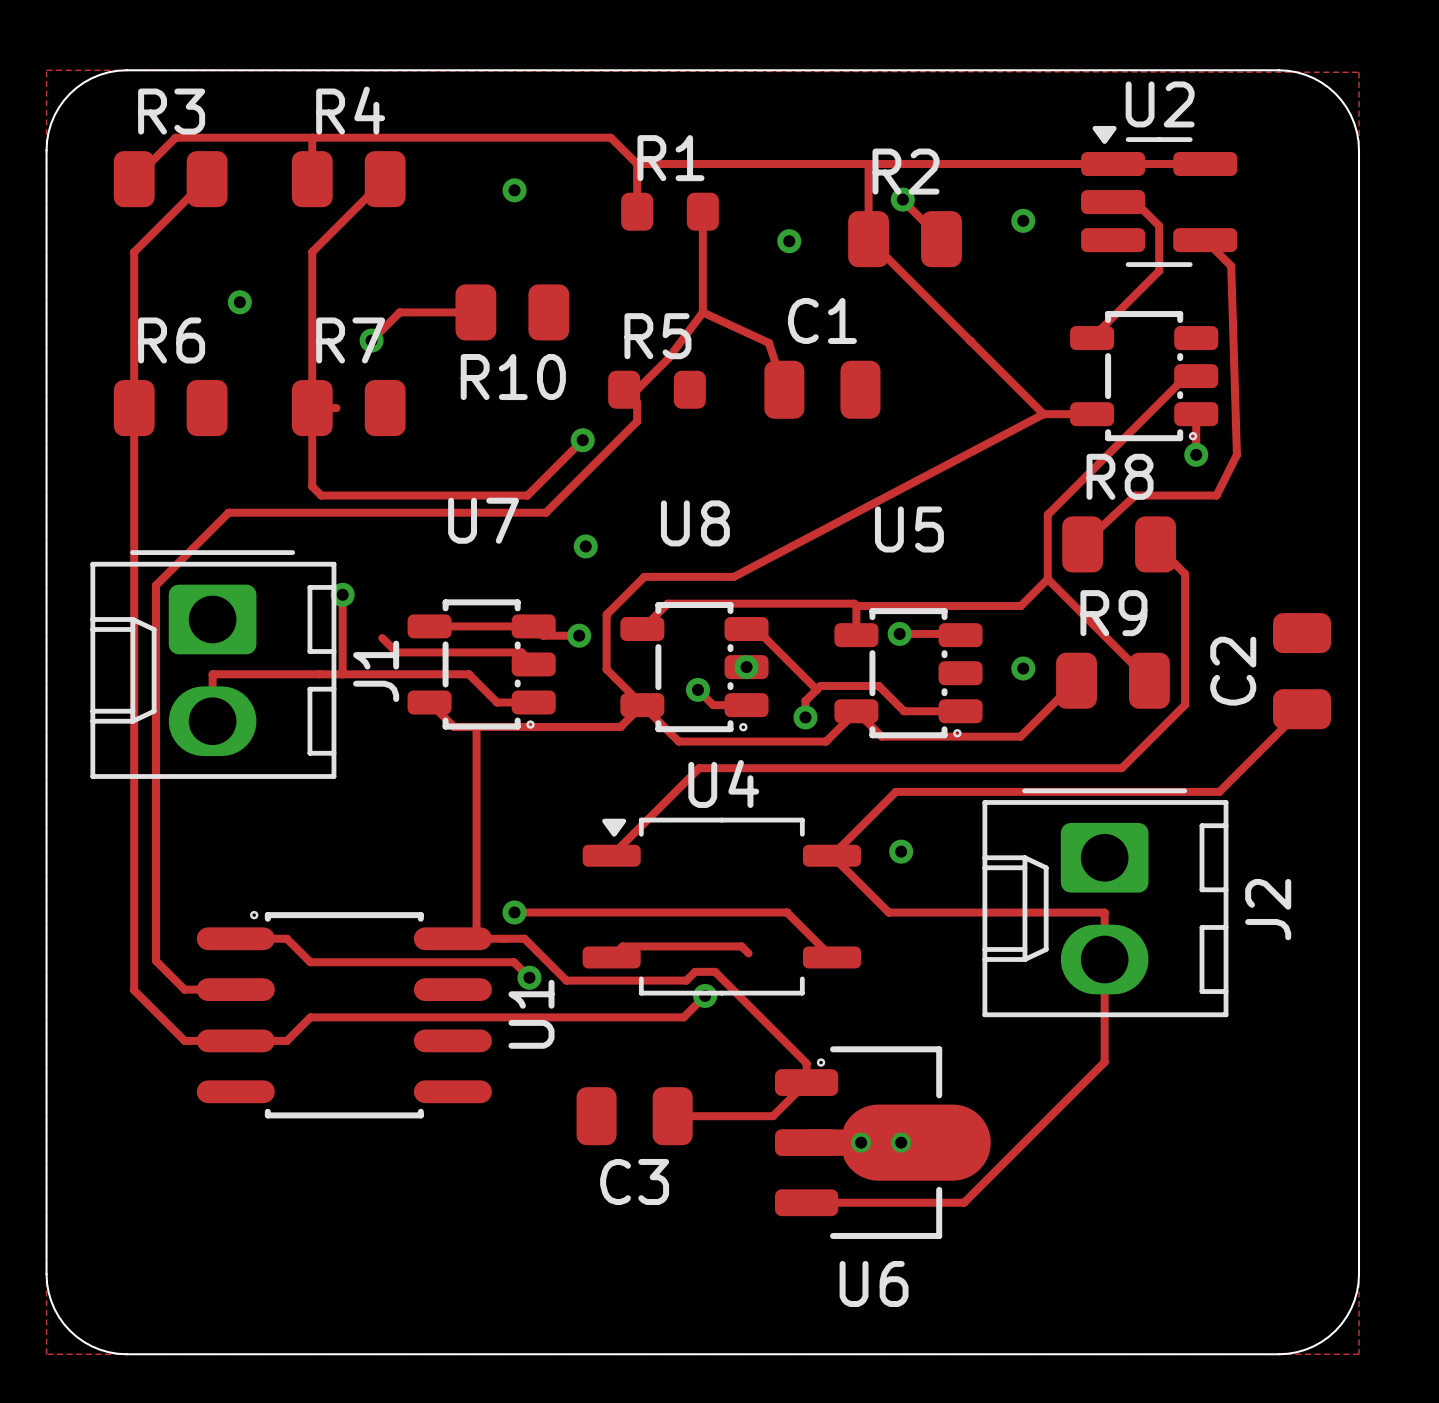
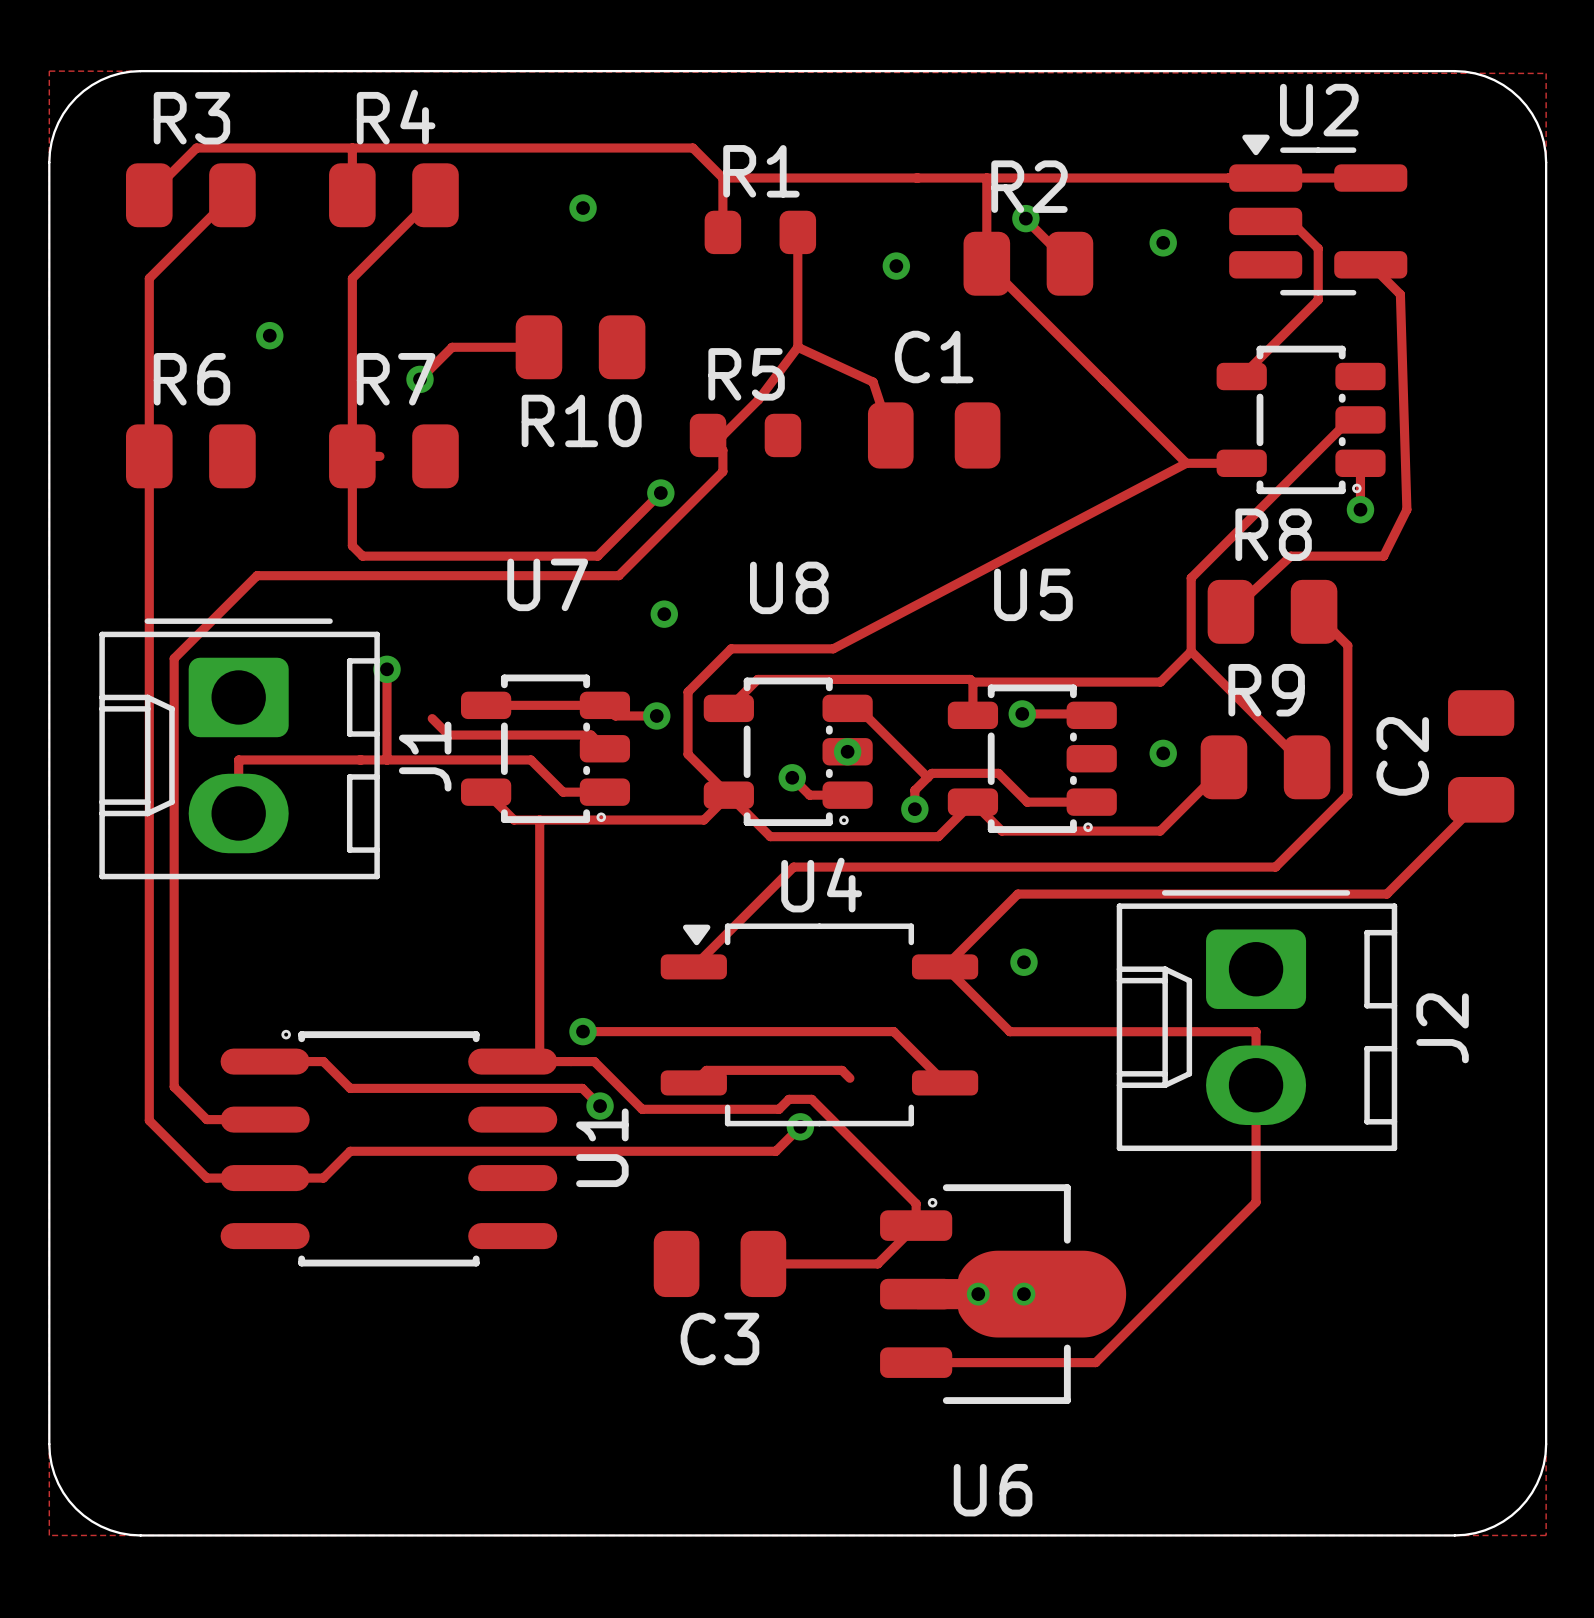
U6 name position: U6 (874, 1283) -> U6 (993, 1490)

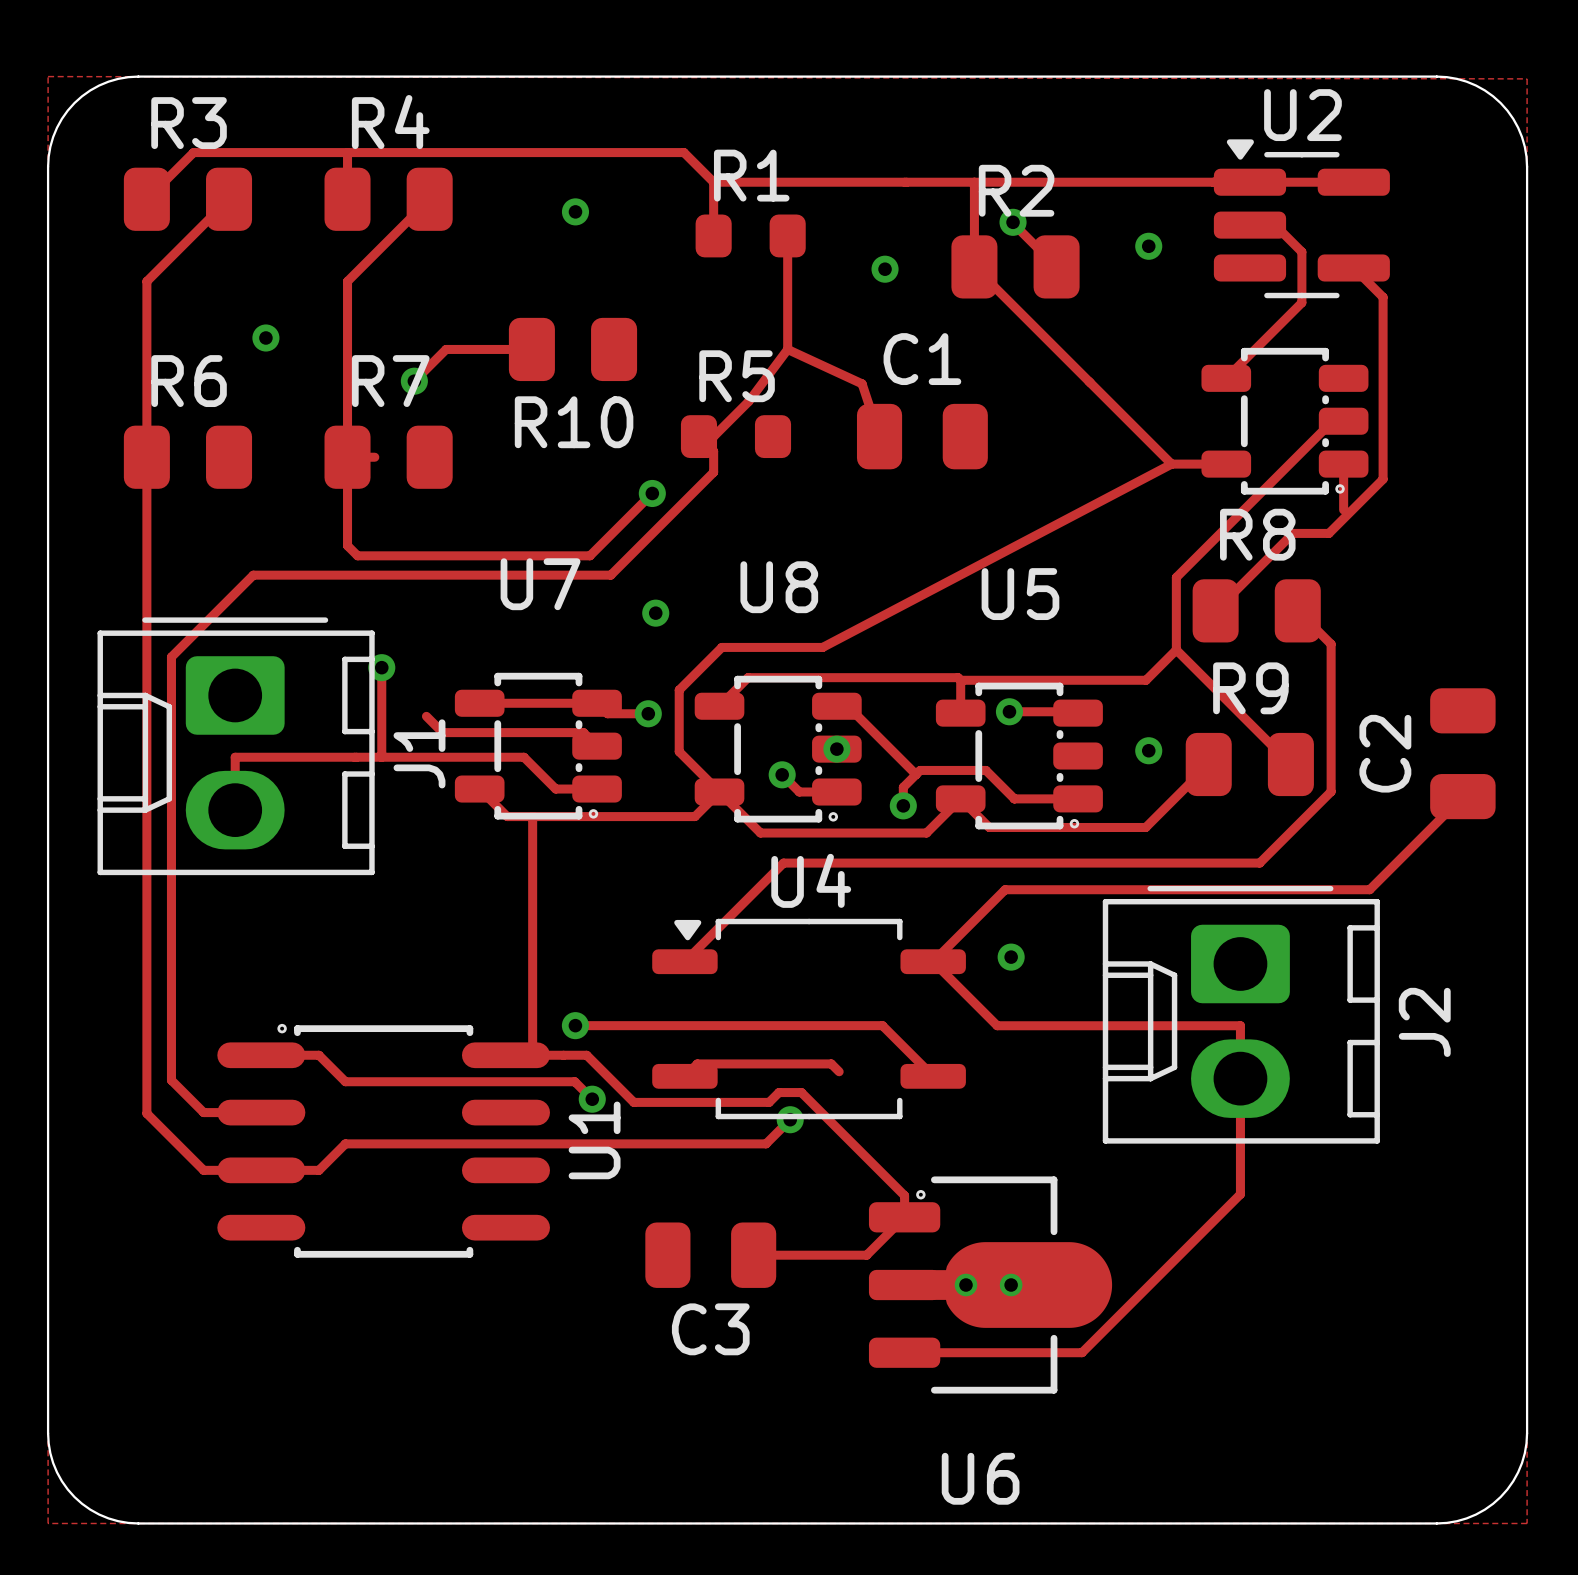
track: (1400, 294) (1406, 509) (1383, 556) (1290, 556) (1230, 611) -> (1383, 297) (1383, 479) (1328, 533) (1293, 533) (1215, 610)
via: (1360, 509) -> none

